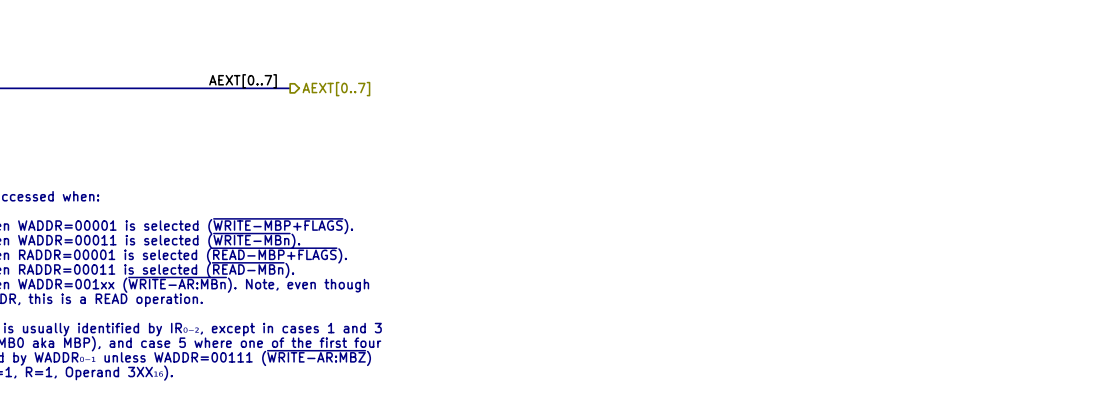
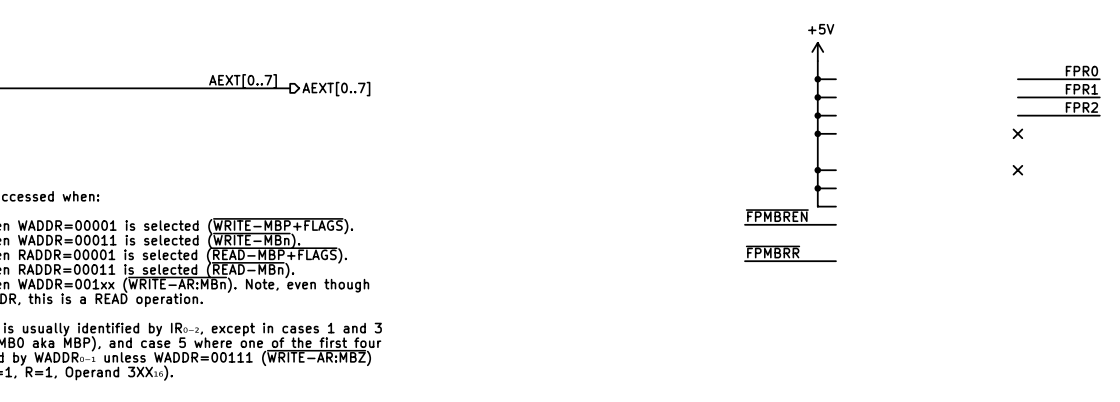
power symbol: none -> +5V (817, 51)
wire: none -> (817, 61) (817, 206) (835, 206)
label: none -> FPR0 (1081, 71)
wire: none -> (817, 79) (835, 79)
junction: none -> (817, 79)
wire: none -> (1017, 79) (1099, 79)
label: none -> FPR1 (1081, 89)
wire: none -> (817, 97) (835, 97)
junction: none -> (817, 97)
wire: none -> (1017, 97) (1099, 97)
label: none -> FPR2 (1081, 107)
wire: none -> (817, 115) (835, 115)
junction: none -> (817, 115)
wire: none -> (1017, 115) (1099, 115)
wire: none -> (817, 133) (835, 133)
junction: none -> (817, 133)
no-connect mark: none -> (1017, 133)
wire: none -> (817, 170) (835, 170)
junction: none -> (817, 170)
no-connect mark: none -> (1017, 170)
wire: none -> (817, 188) (835, 188)
junction: none -> (817, 188)
label: none -> ~{FPMBREN} (777, 215)
wire: none -> (745, 224) (835, 224)
label: none -> ~{FPMBRR} (773, 252)
wire: none -> (745, 261) (835, 261)

